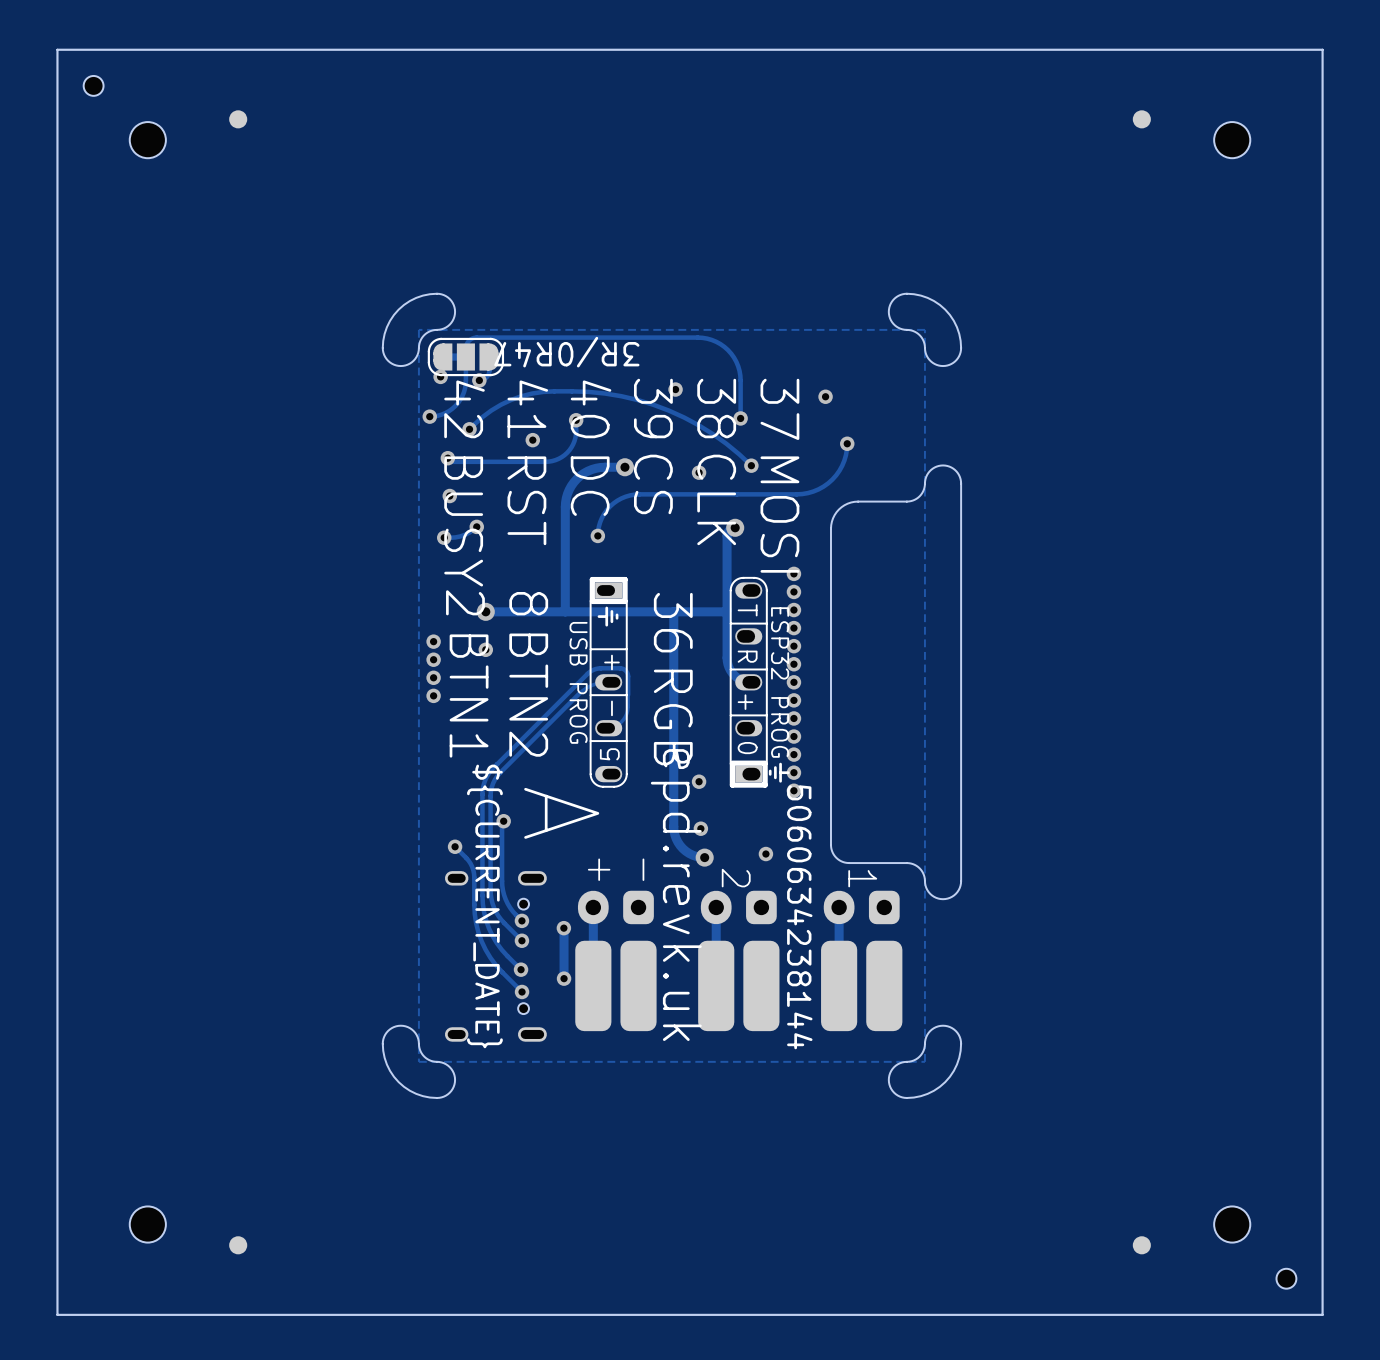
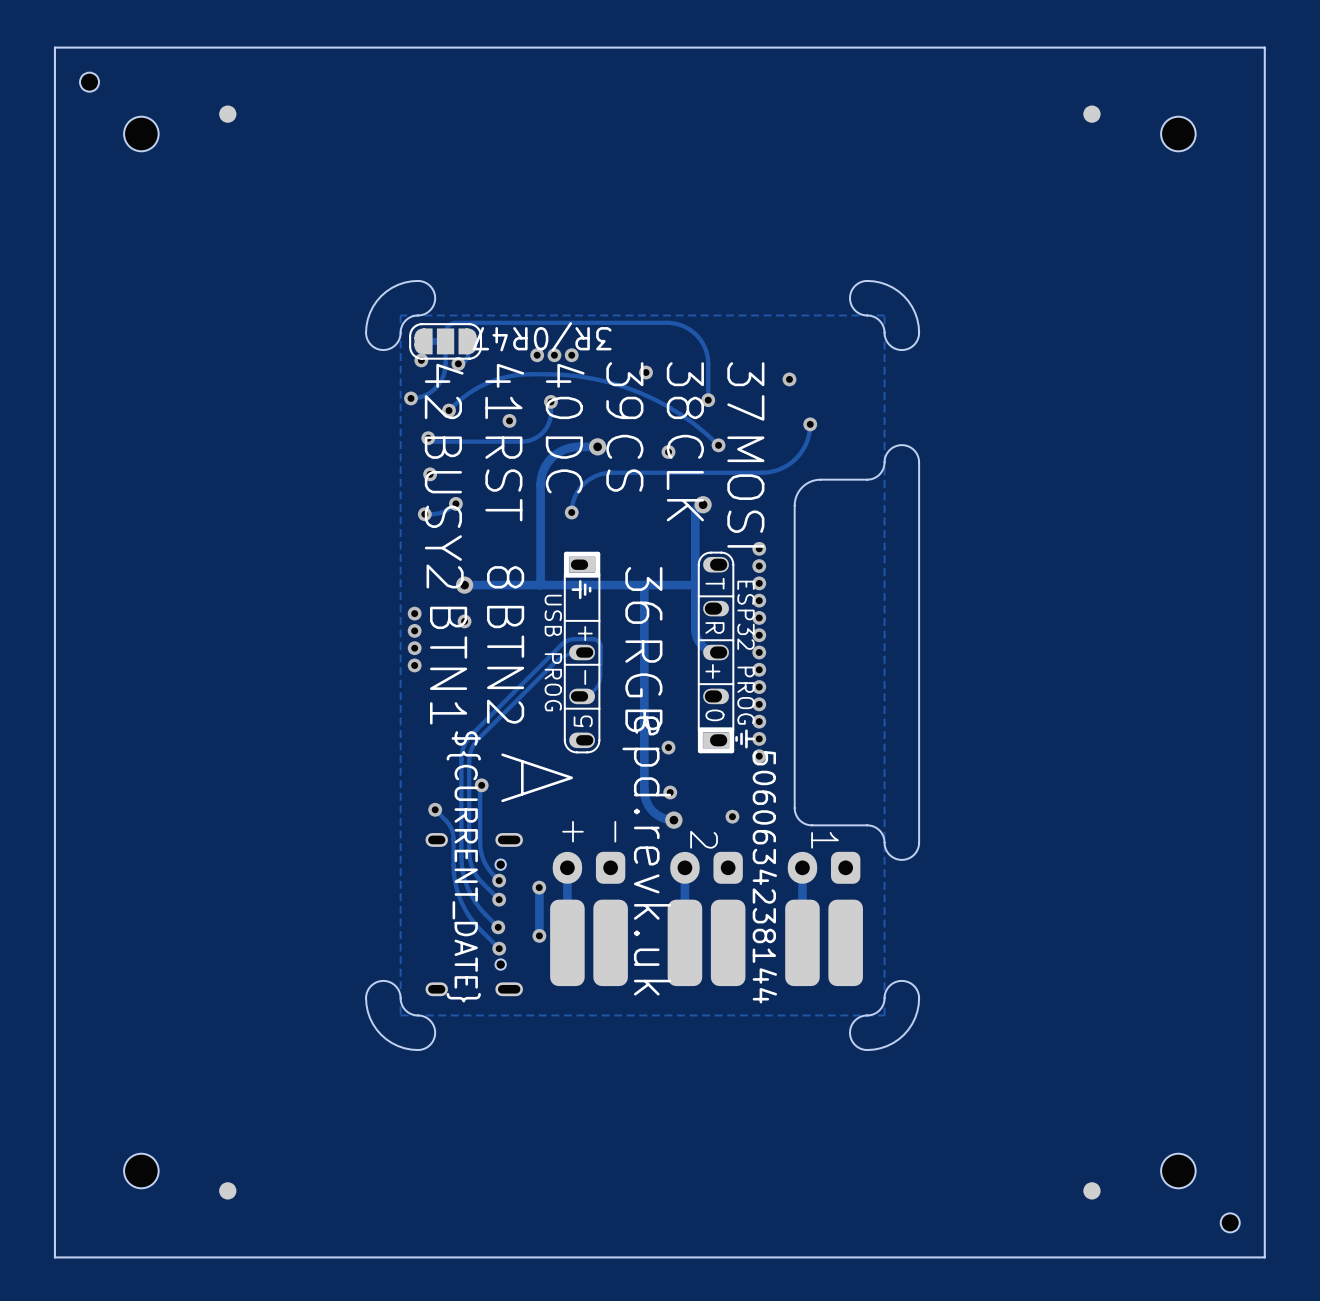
via: none -> (537, 355)
via: none -> (554, 355)
via: none -> (571, 355)

